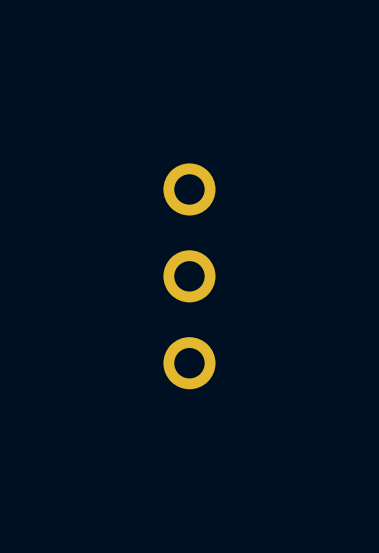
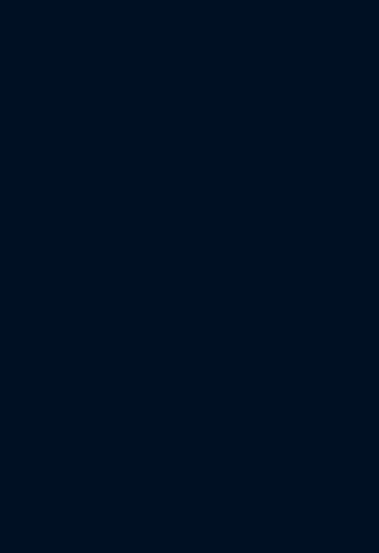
part: (189, 276) -> none

